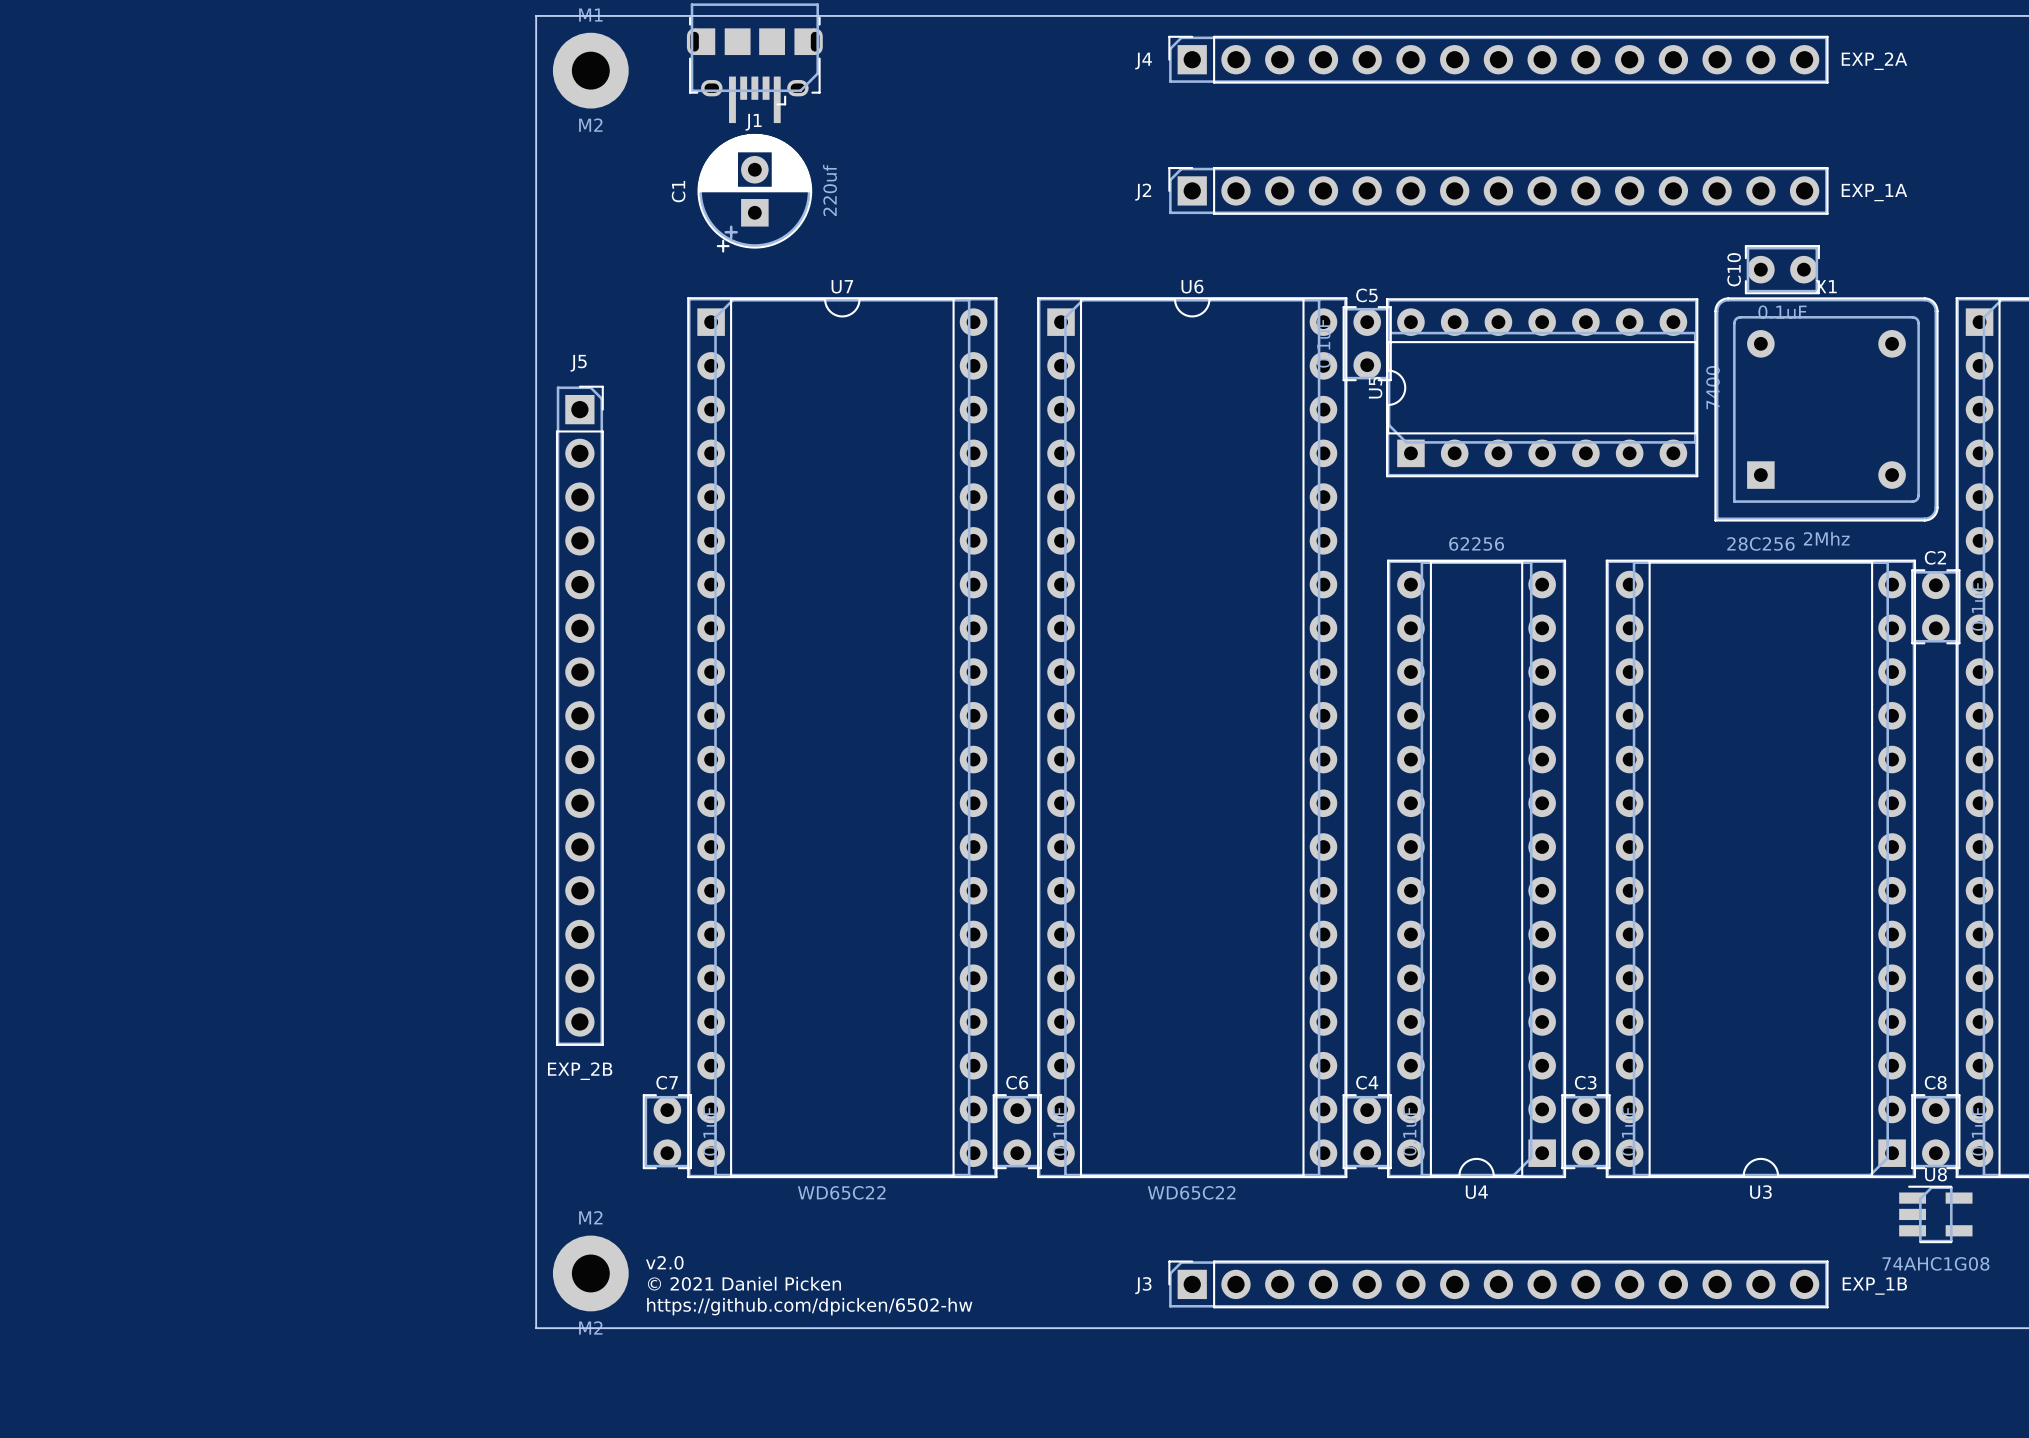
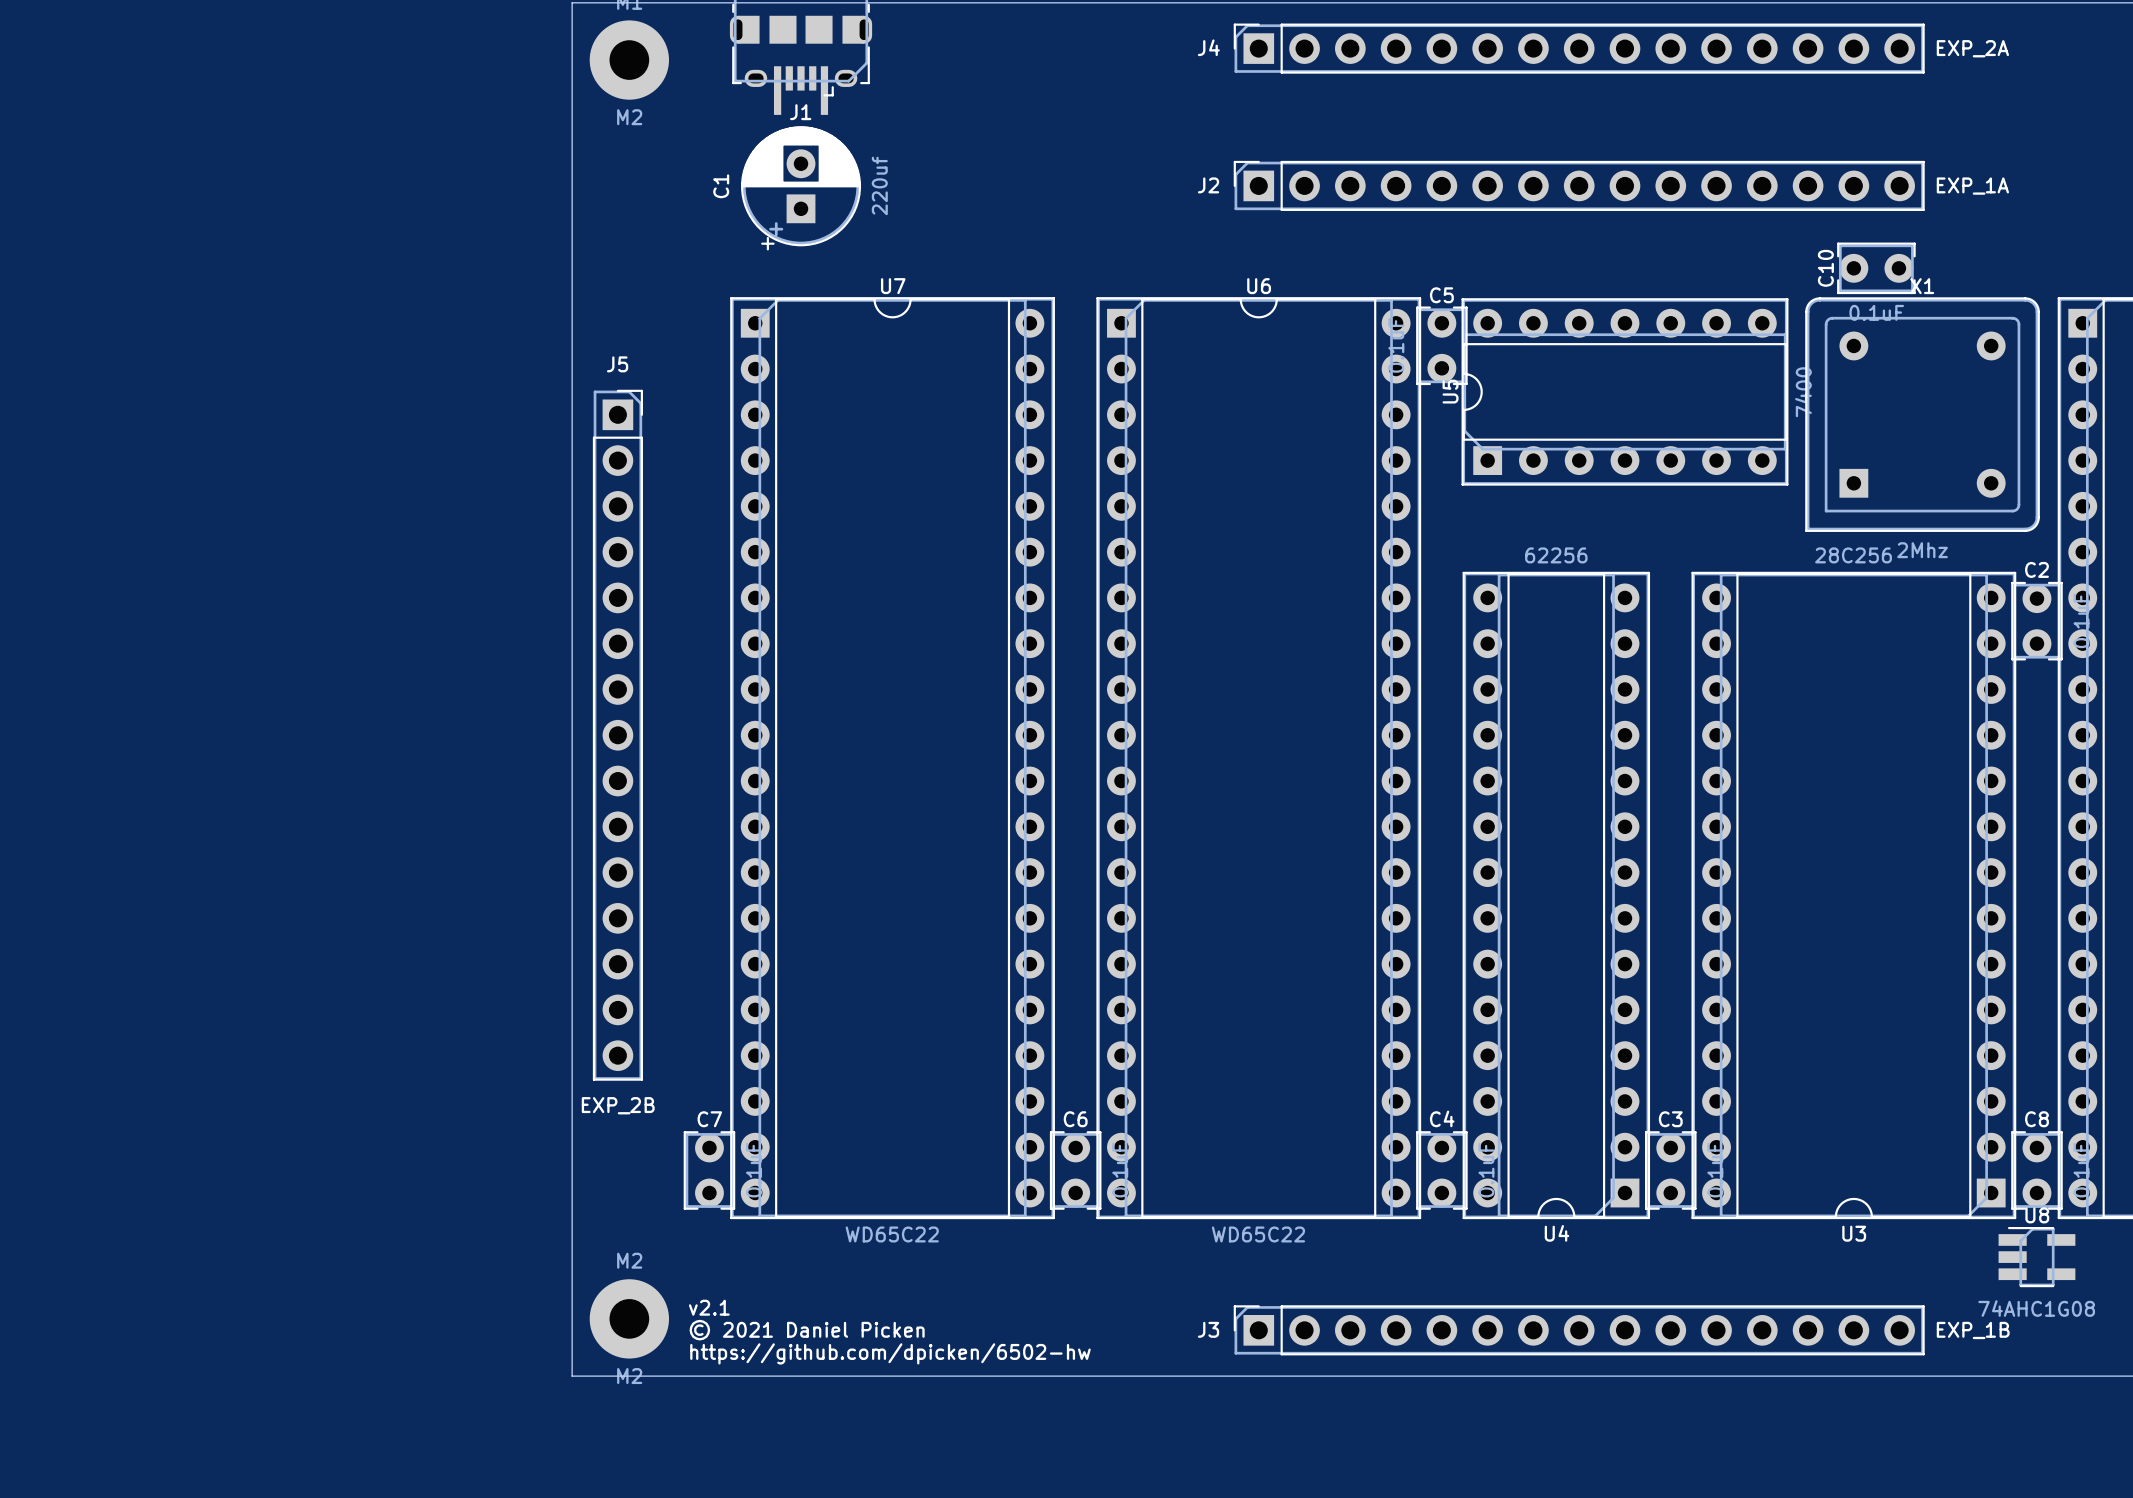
text: v2.0 (664, 1262) -> v2.1 (709, 1307)

